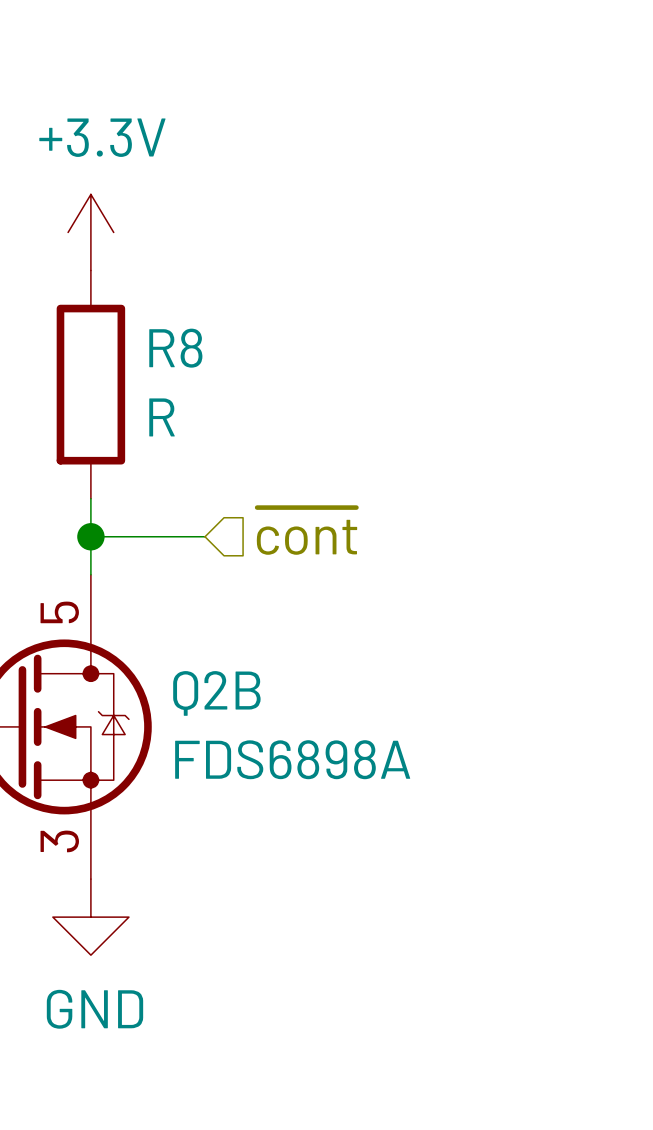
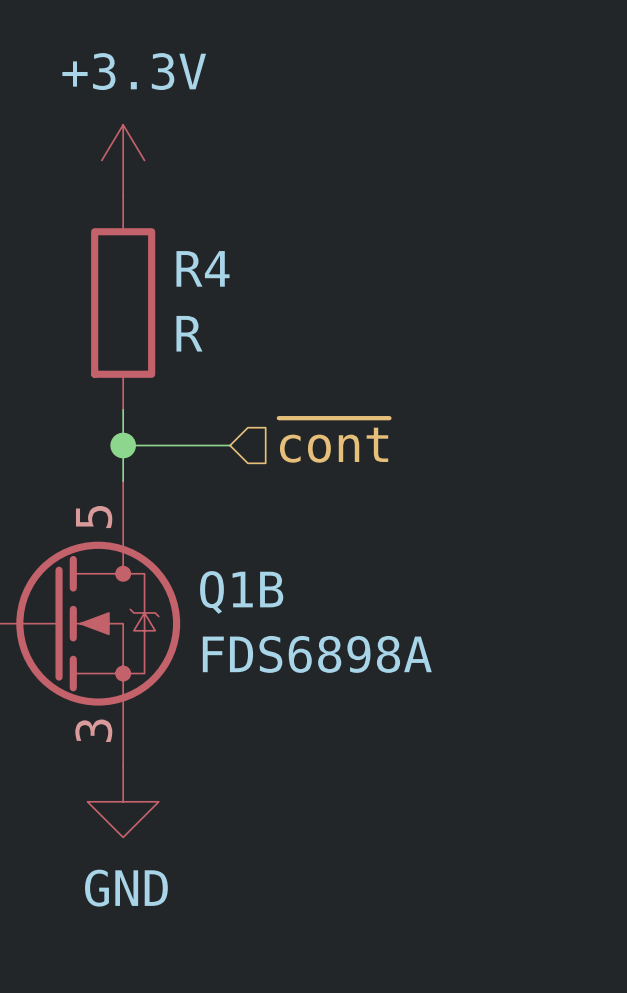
R8 name: R8 (175, 348) -> R4 (203, 268)
Q2B name: Q2B (216, 693) -> Q1B (241, 592)

